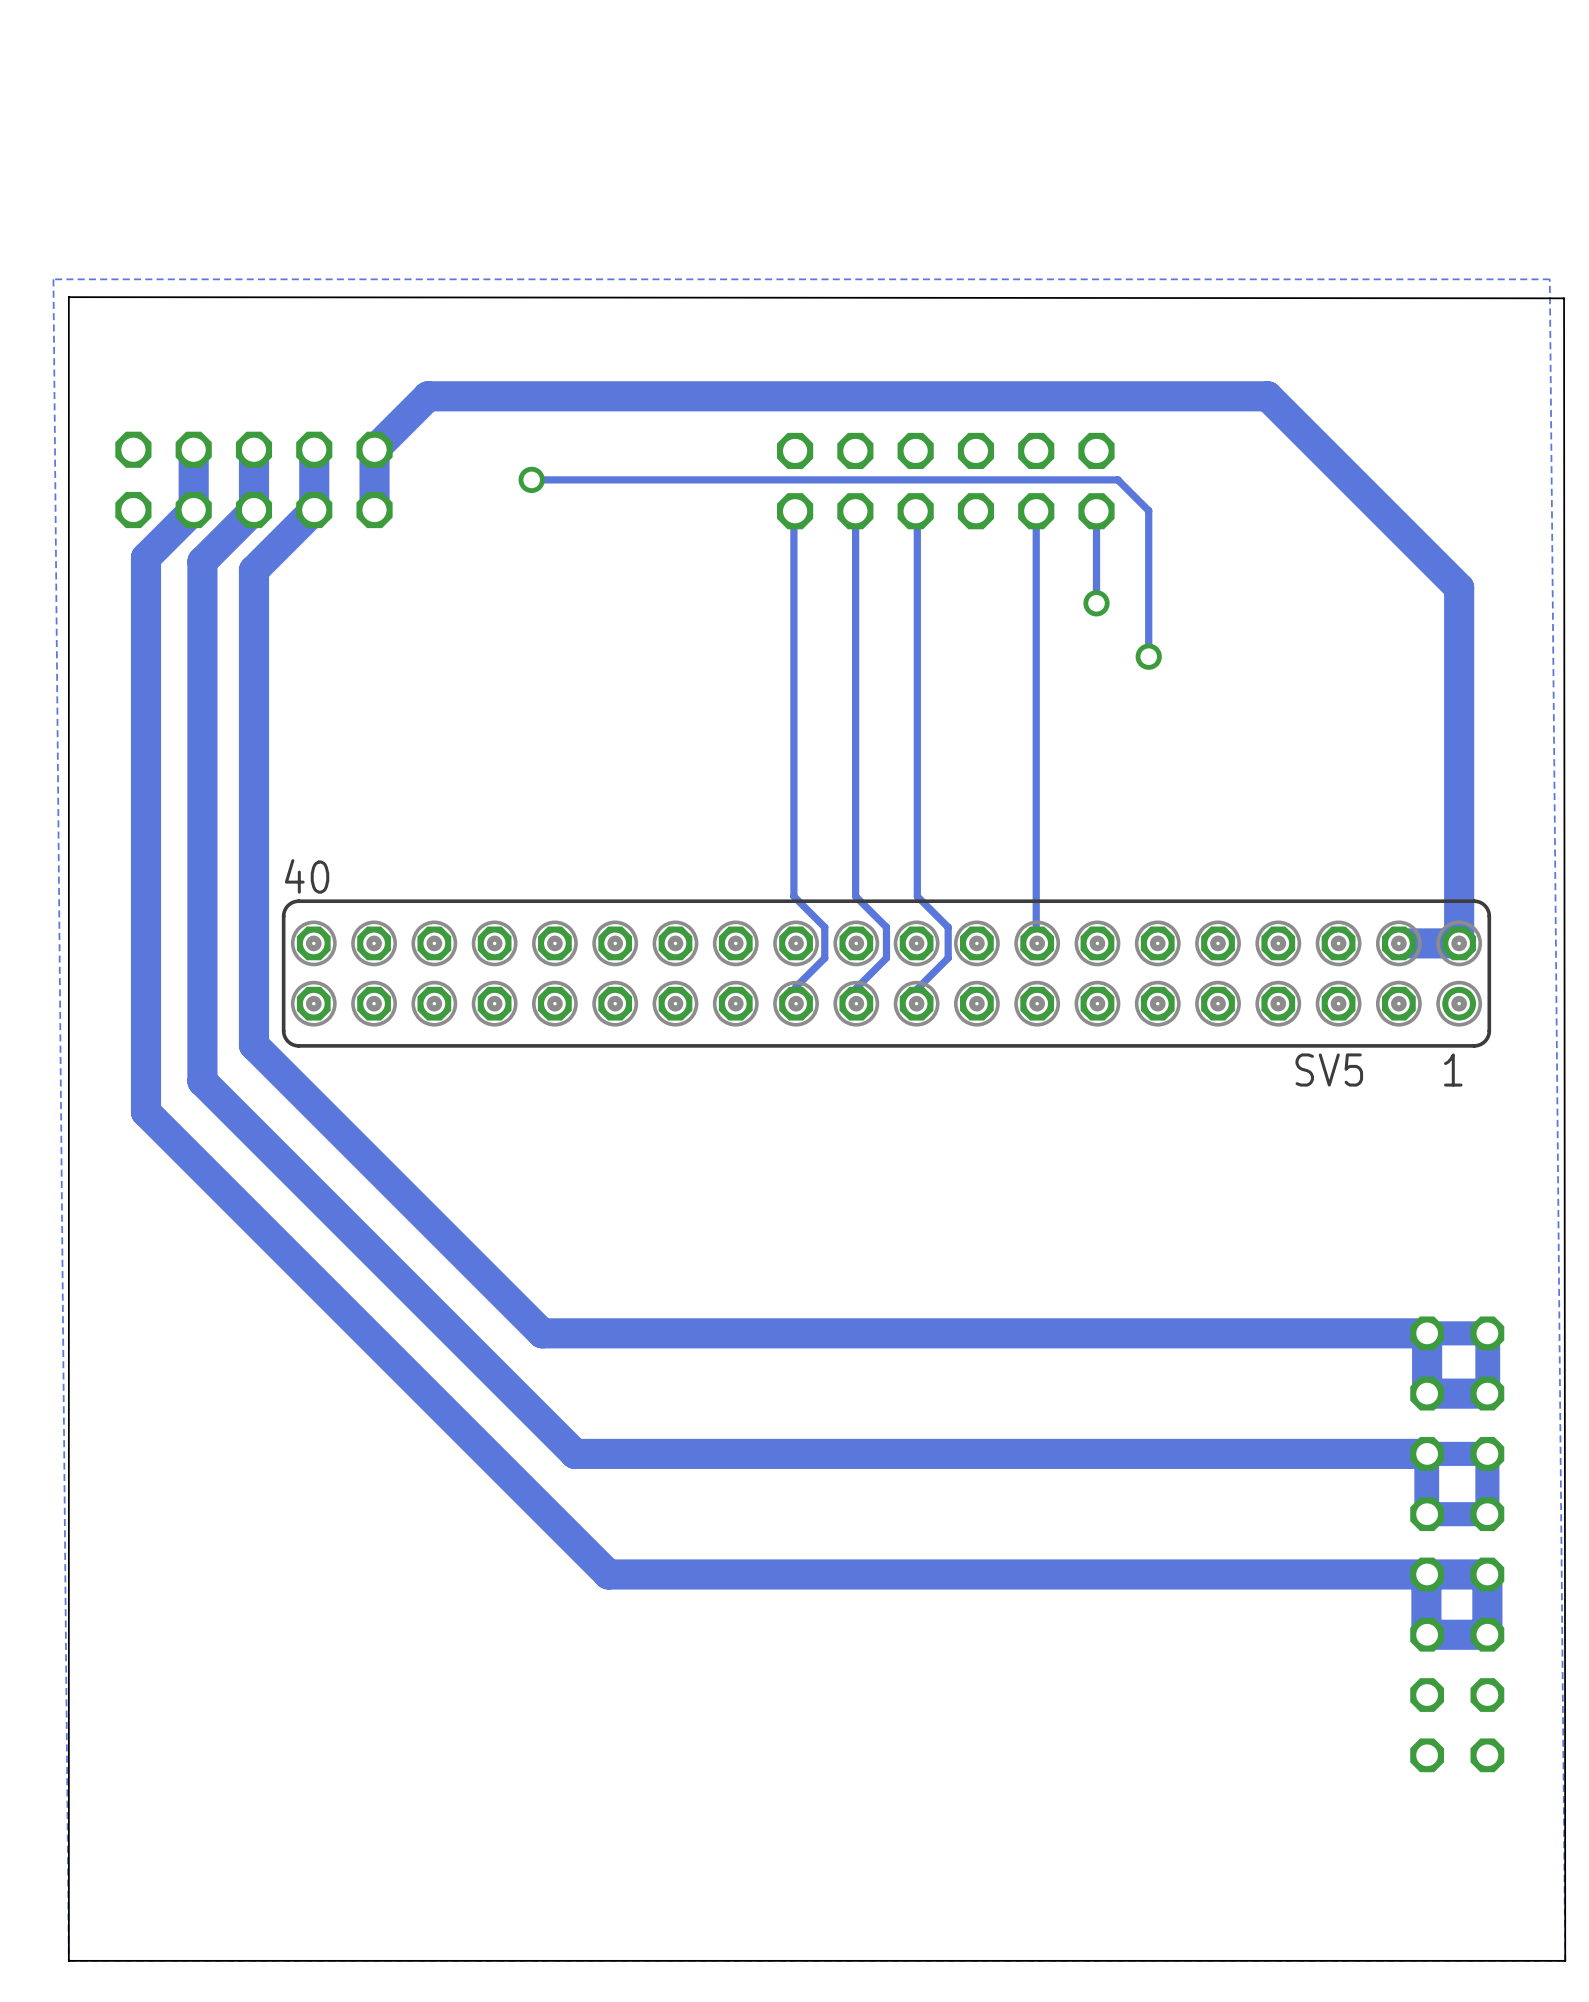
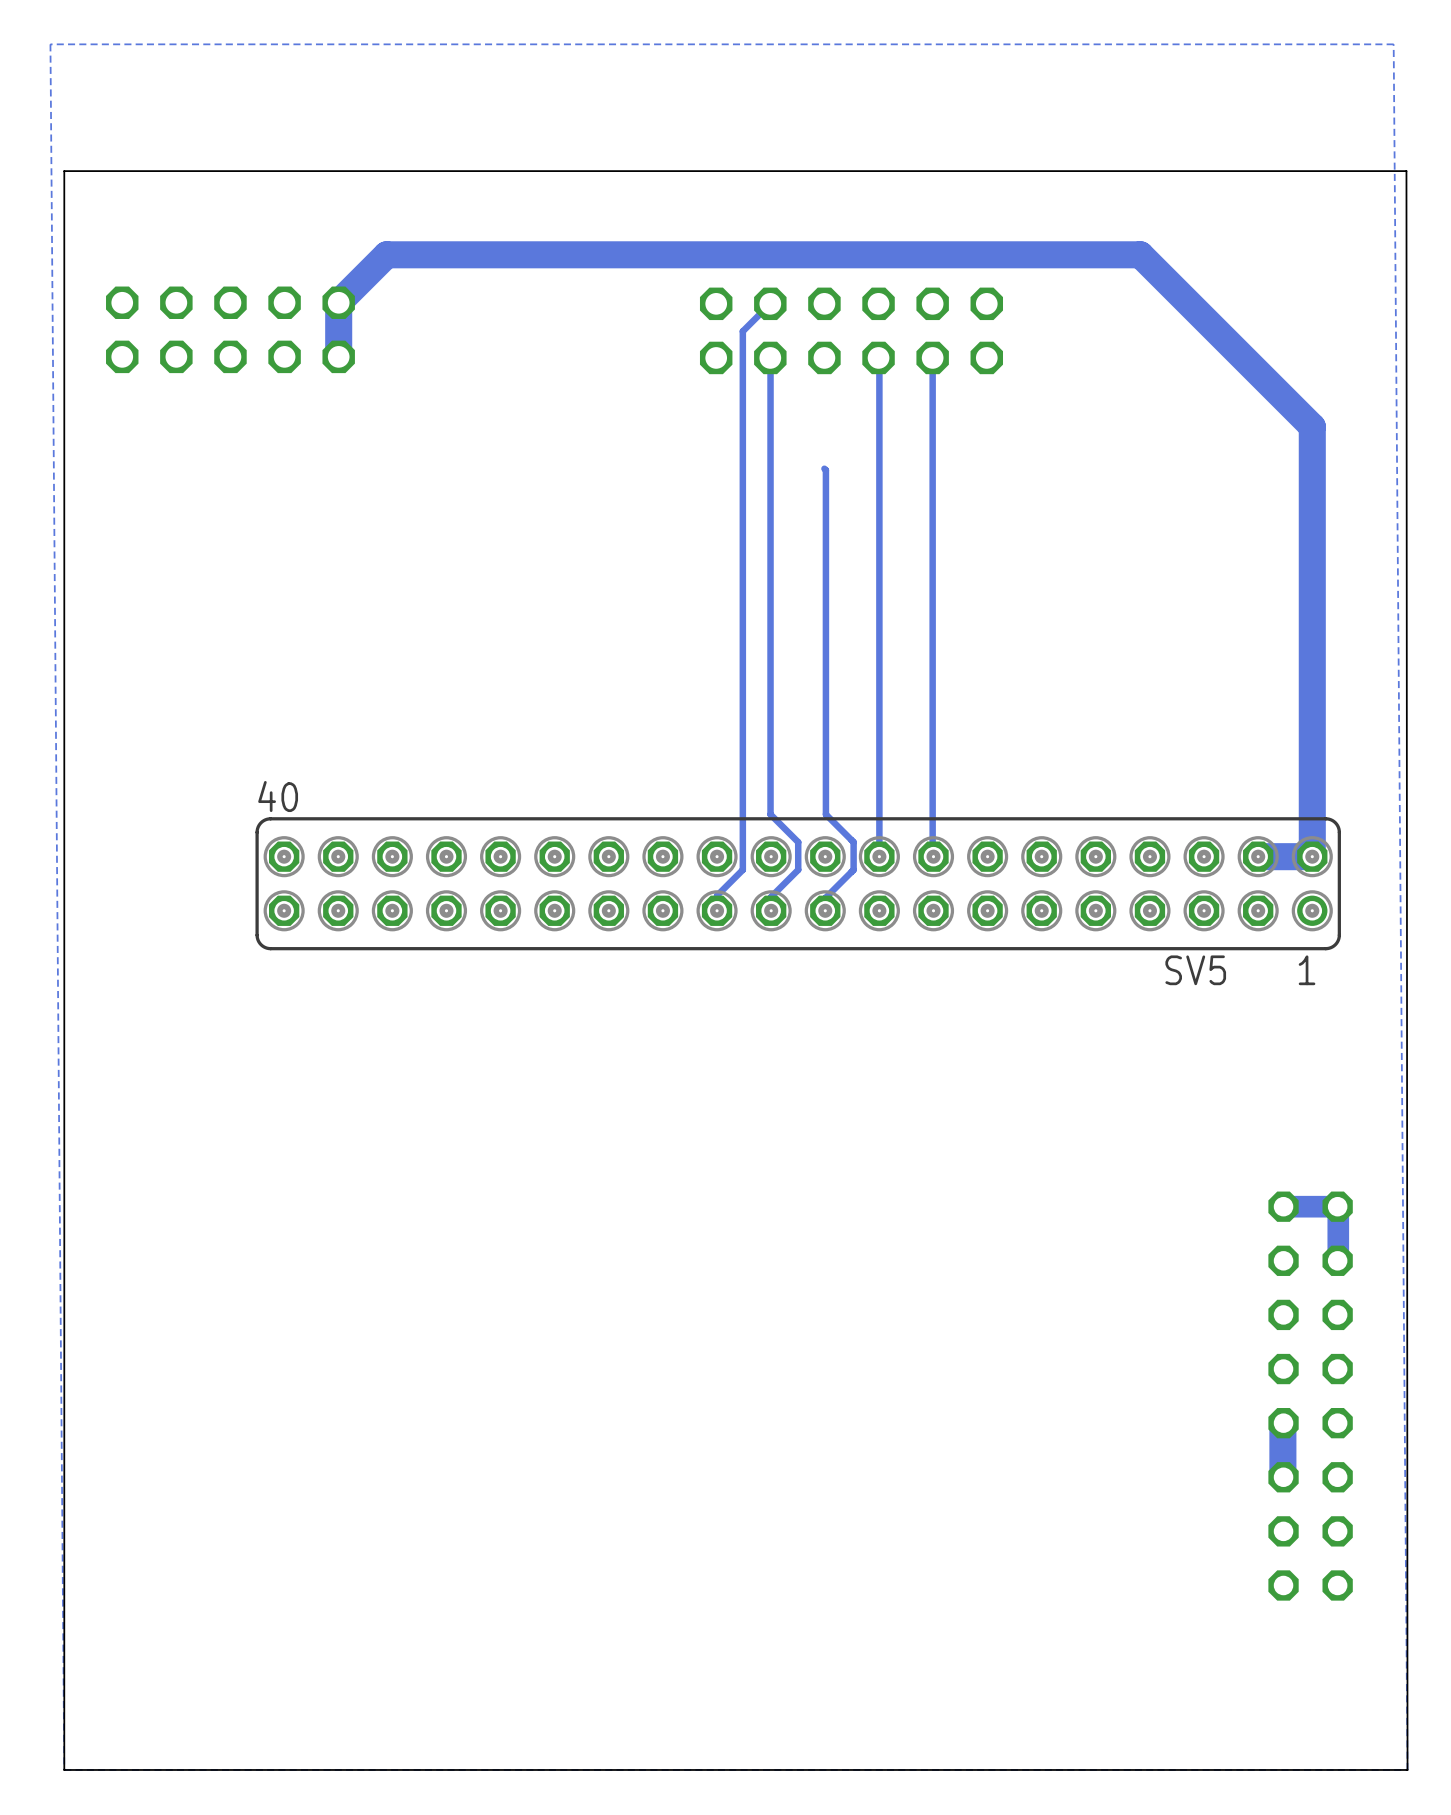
board edge: (68, 297) (1564, 298) -> (64, 276) (64, 171) (1406, 171) (1406, 277)
track: none -> (878, 357) (879, 856)
track: none -> (932, 357) (932, 468)
track: none -> (770, 358) (770, 468)
track: (193, 449) (193, 510) (145, 557) (145, 1112) (608, 1574) (1487, 1574) (1487, 1634) (1427, 1634) -> none
track: (253, 449) (253, 510) (202, 561) (202, 1081) (575, 1453) (1427, 1453) (1427, 1513) (1426, 1513) (1426, 1453) (1487, 1453) (1487, 1514) (1426, 1514) -> none
track: (314, 449) (314, 510) (253, 570) (253, 1045) (542, 1333) (1427, 1333) (1427, 1393) (1487, 1393) -> none
part position: (253, 479) -> (230, 329)
track: (531, 479) (1117, 479) (1148, 510) (1148, 656) -> none
via: (531, 479) -> none
part position: (945, 481) -> (851, 330)
track: (374, 510) (374, 449) (427, 396) (1267, 396) (1459, 587) -> (338, 356) (338, 302) (386, 254) (1140, 254) (1312, 426) (1312, 537)
track: (795, 511) (793, 896) (824, 927) -> (770, 303) (742, 331) (742, 842)
track: (1096, 511) (1096, 603) -> none
via: (1096, 603) -> none
via: (1148, 656) -> none
zone outline: (1565, 1960) (1549, 279) (53, 279) (68, 1960) -> (1407, 1769) (1393, 44) (50, 44) (64, 1769)

